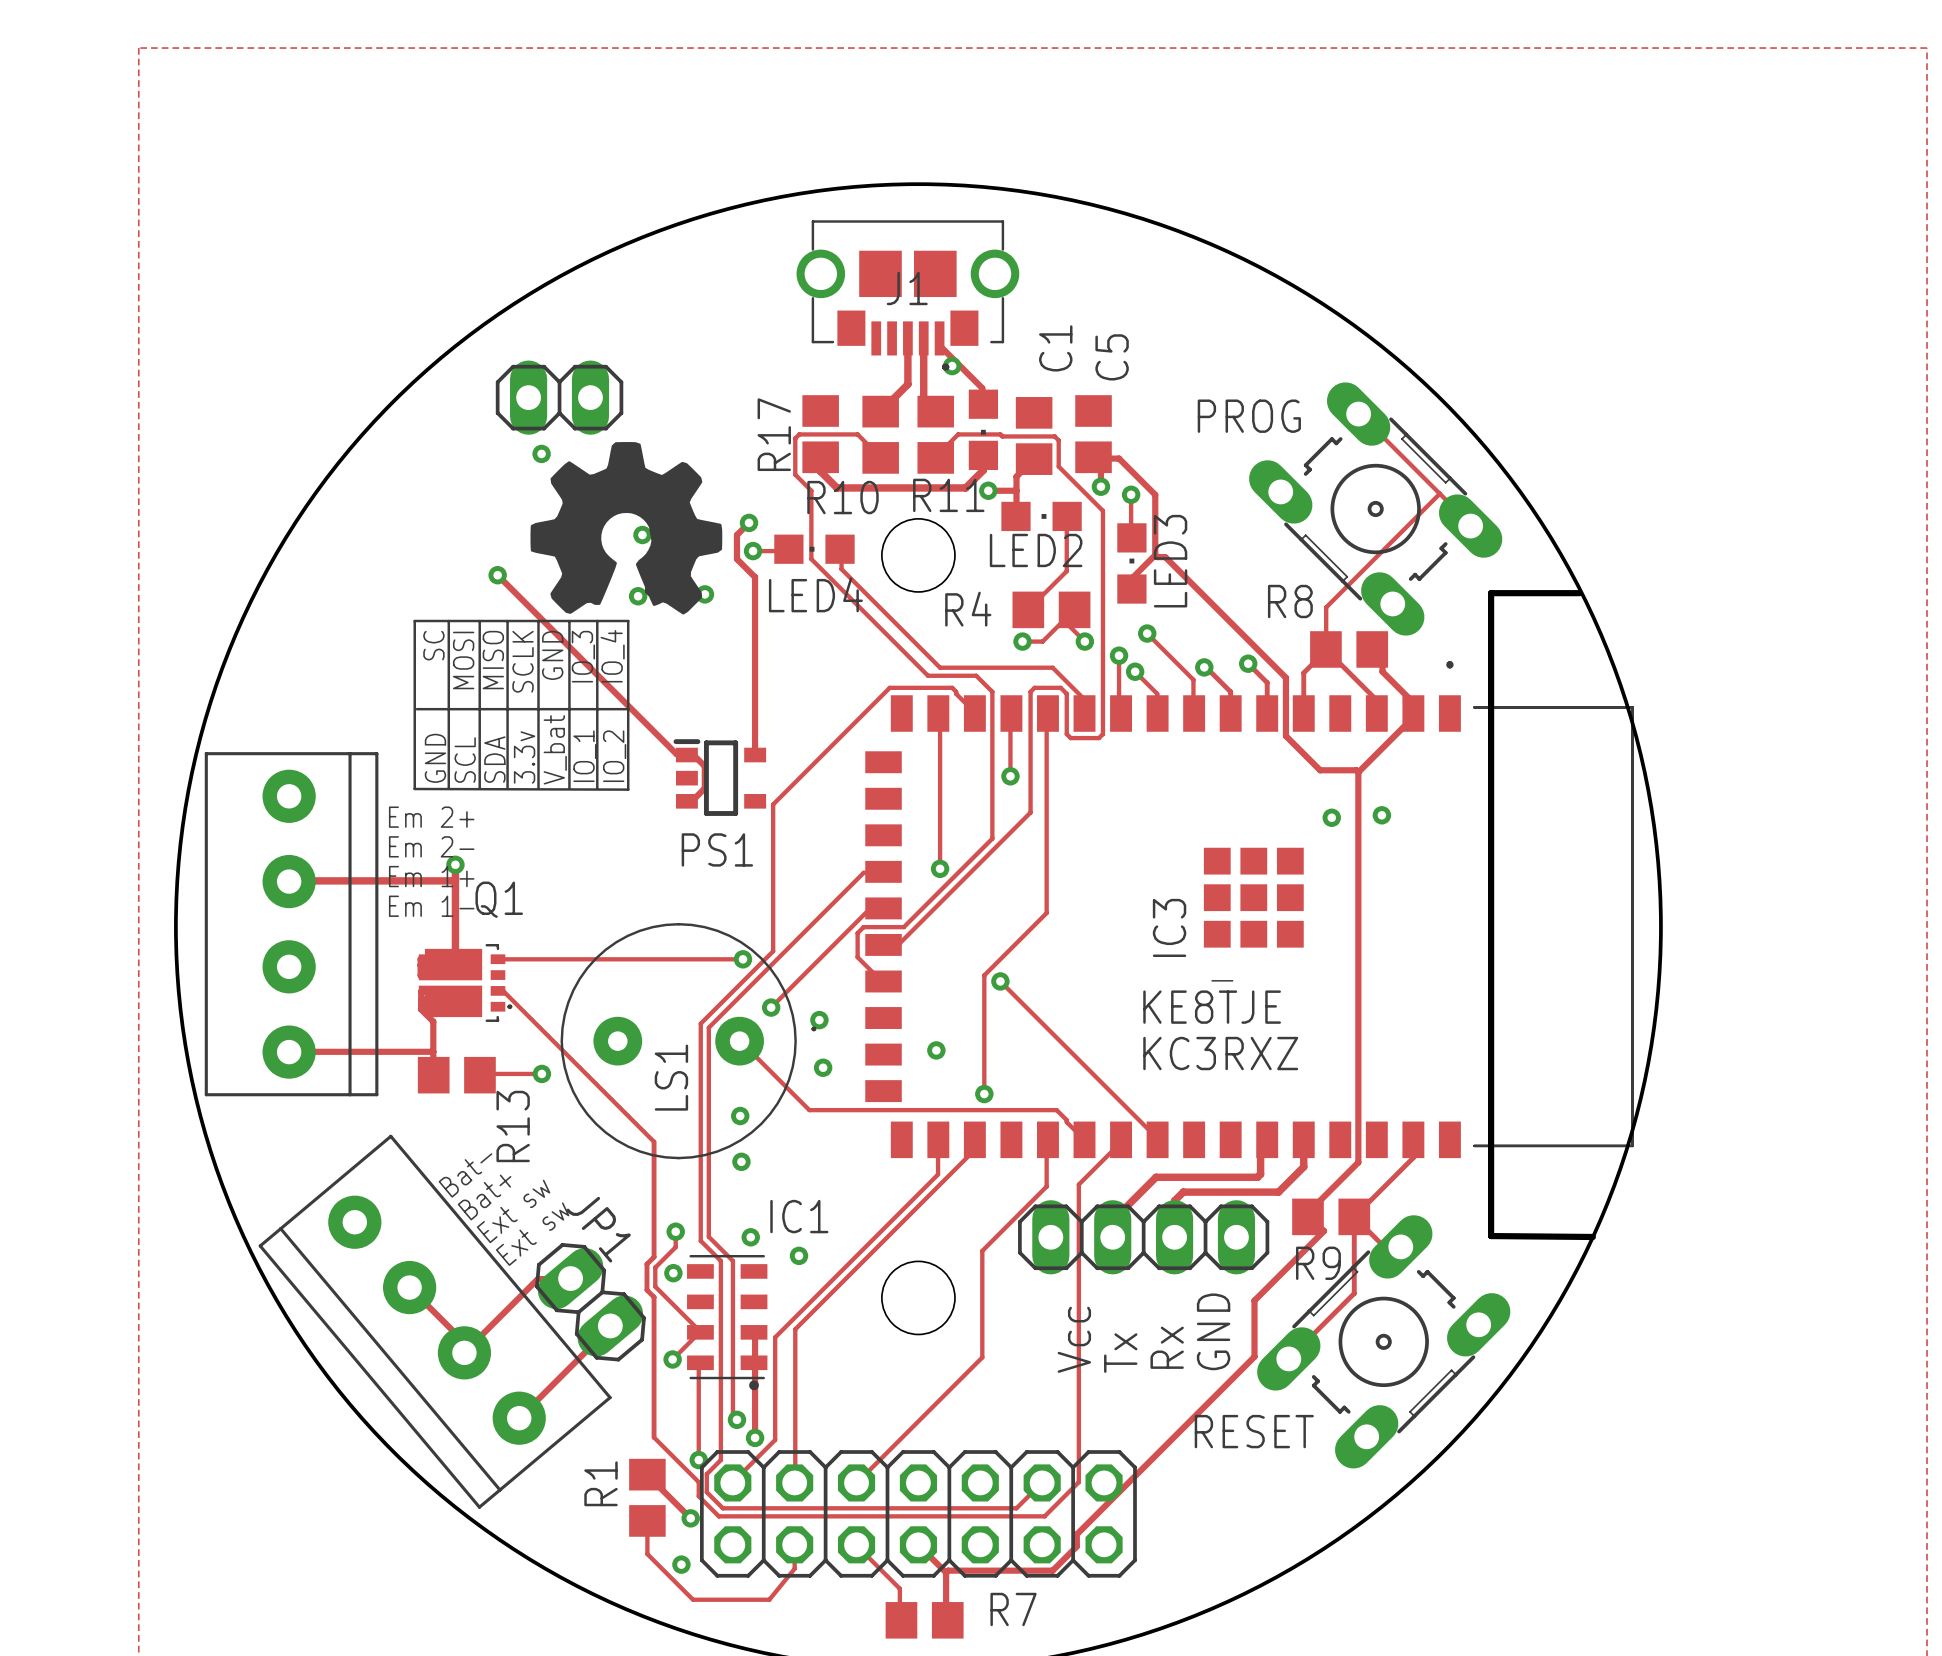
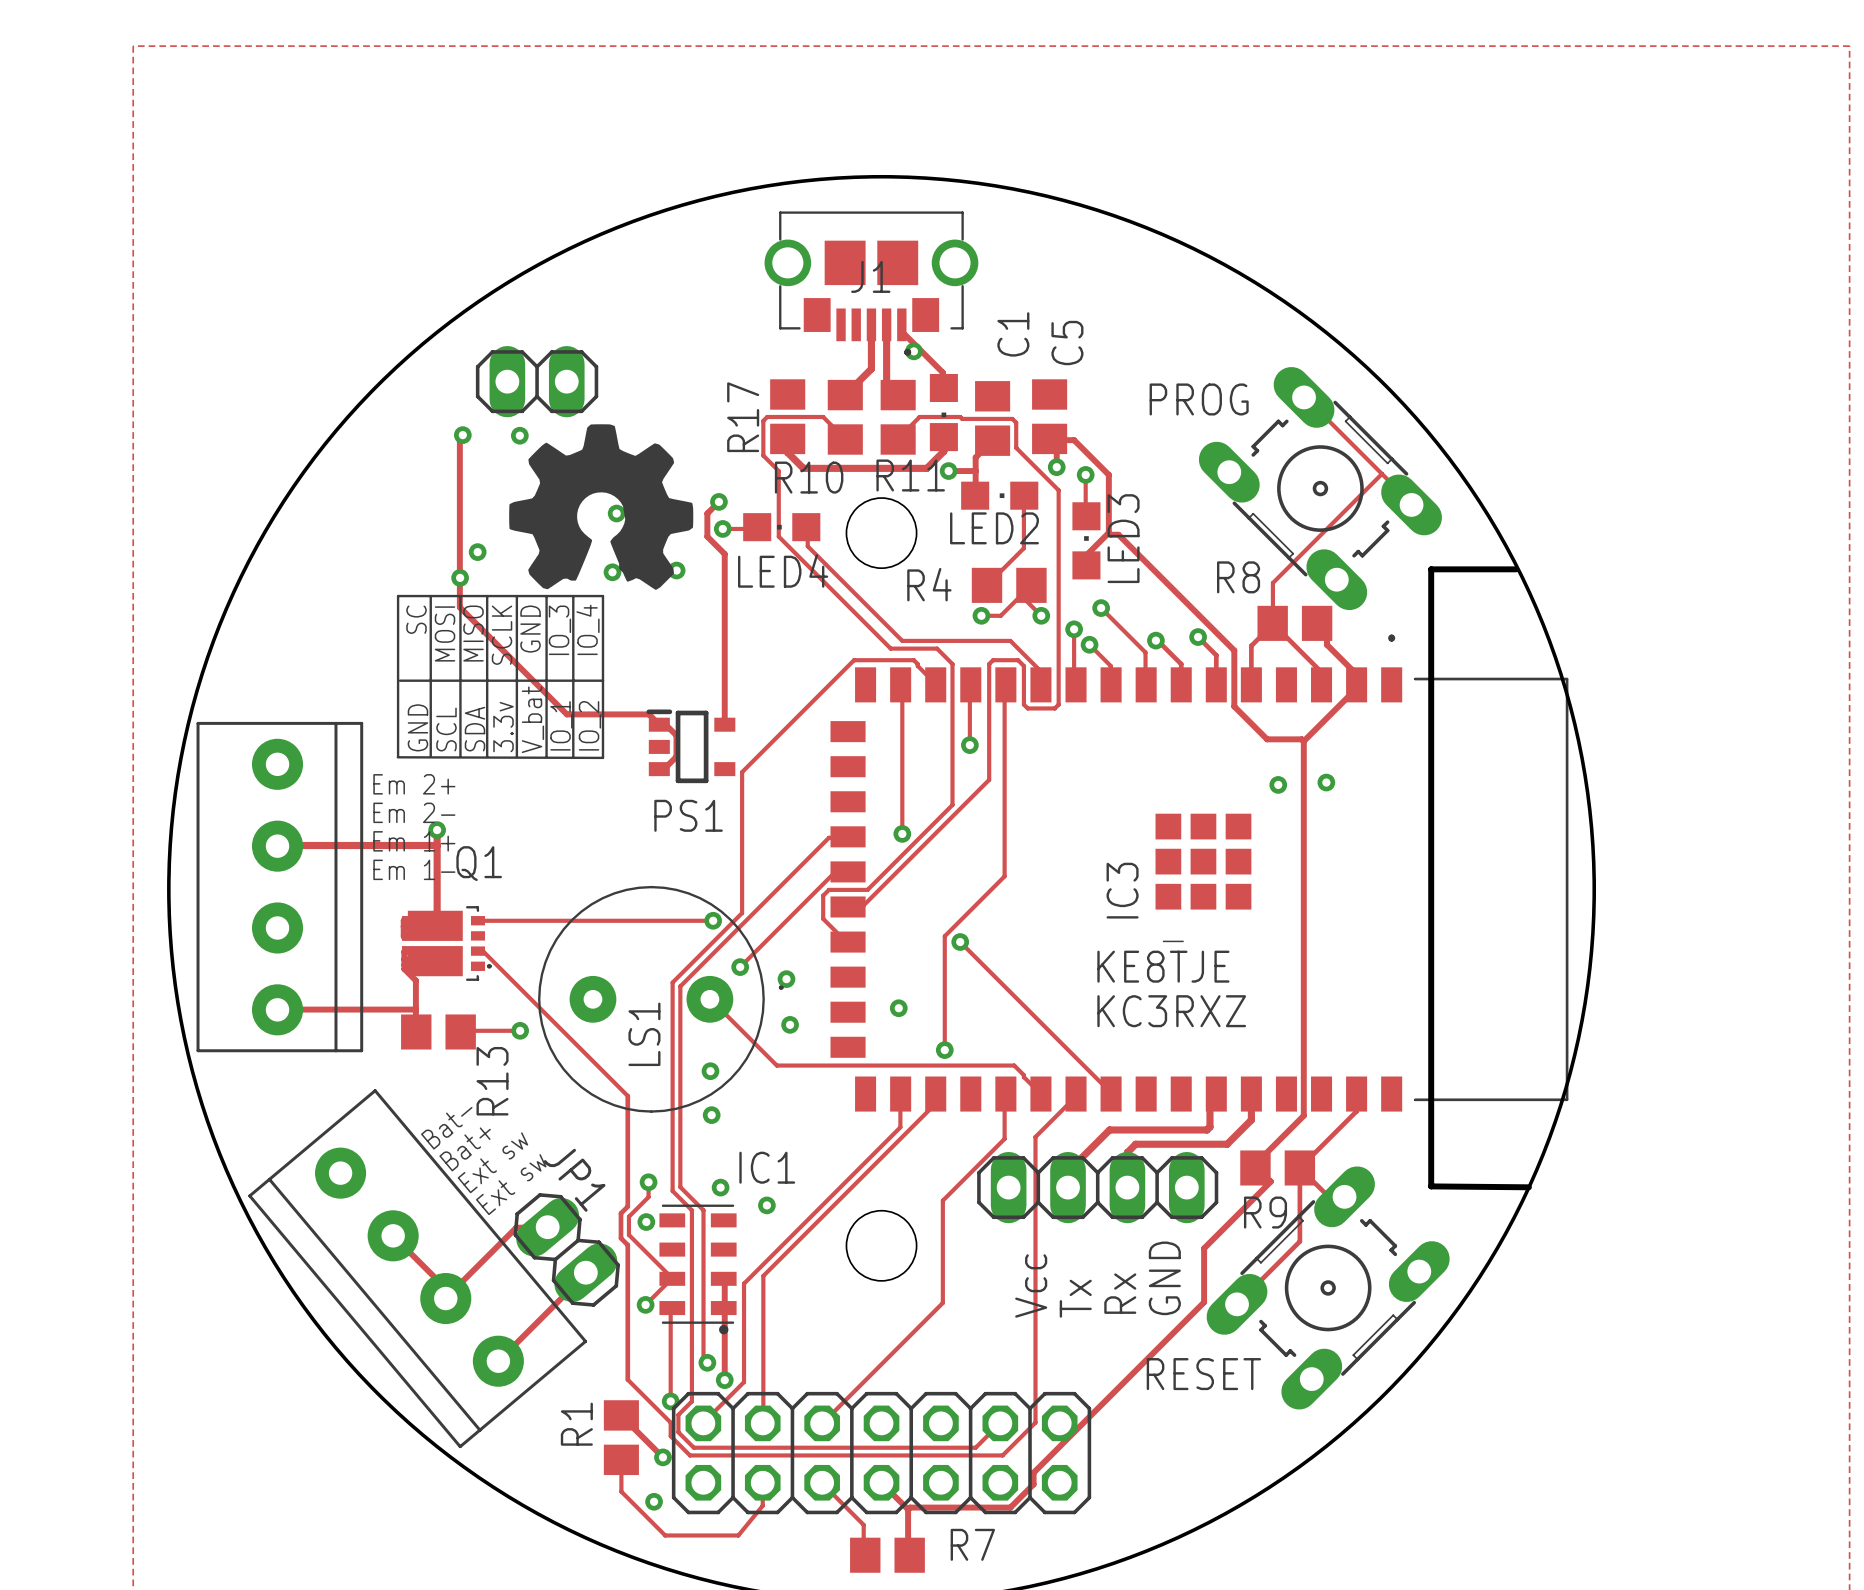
via: none -> (462, 435)
track: (497, 575) (676, 754) (694, 756) -> (462, 435) (459, 438) (459, 607) (566, 714) (649, 714) (659, 724) (666, 725)
via: none -> (460, 577)

